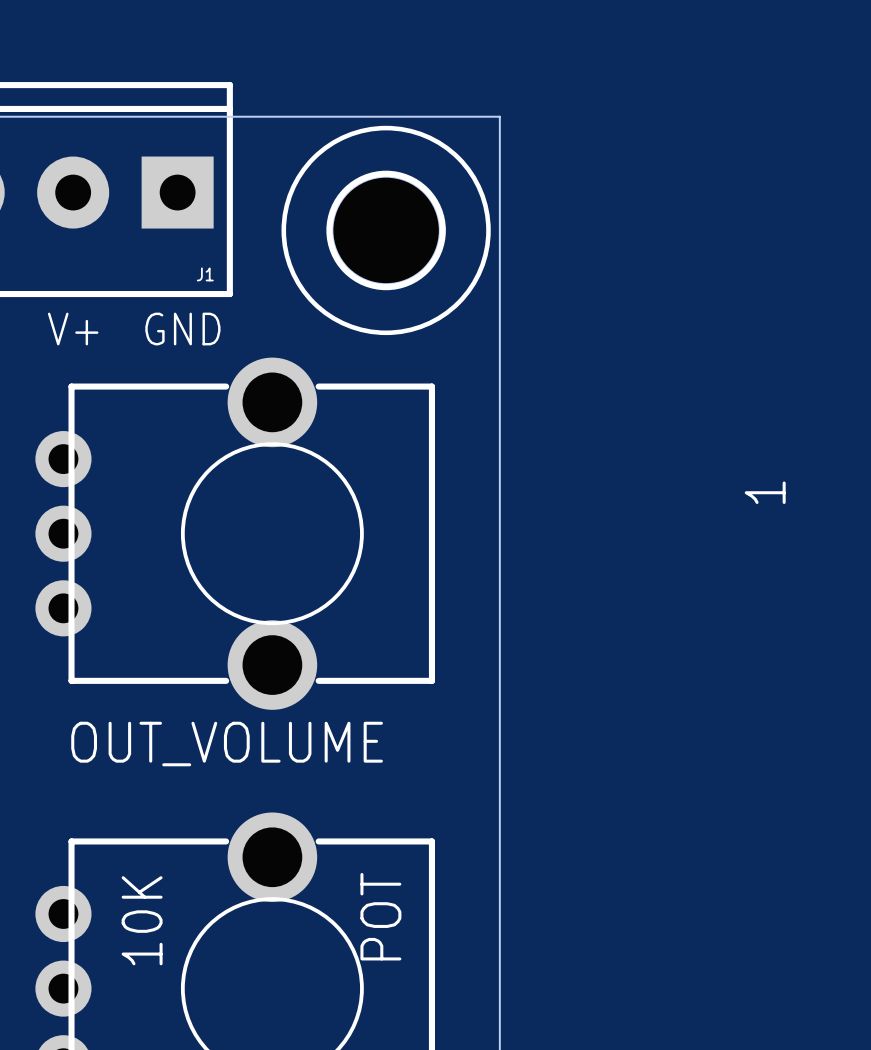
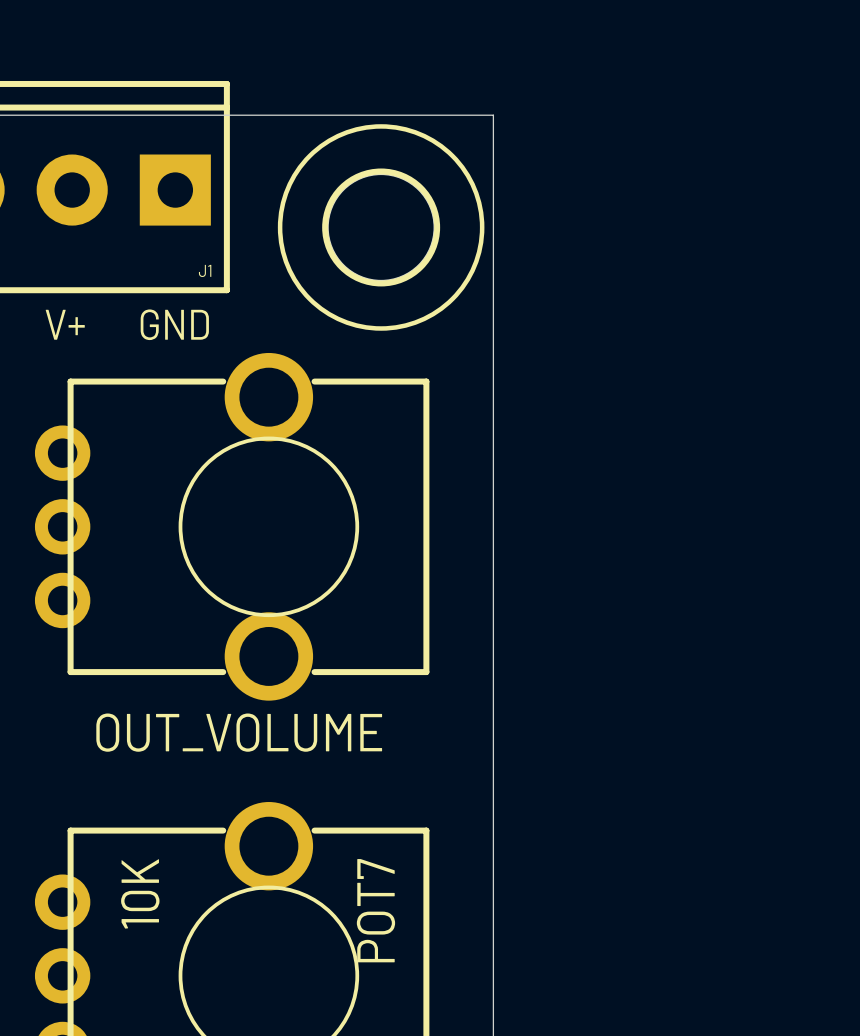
text: 1 (765, 492) -> none
POT name: POT (380, 916) -> POT7 (375, 910)

